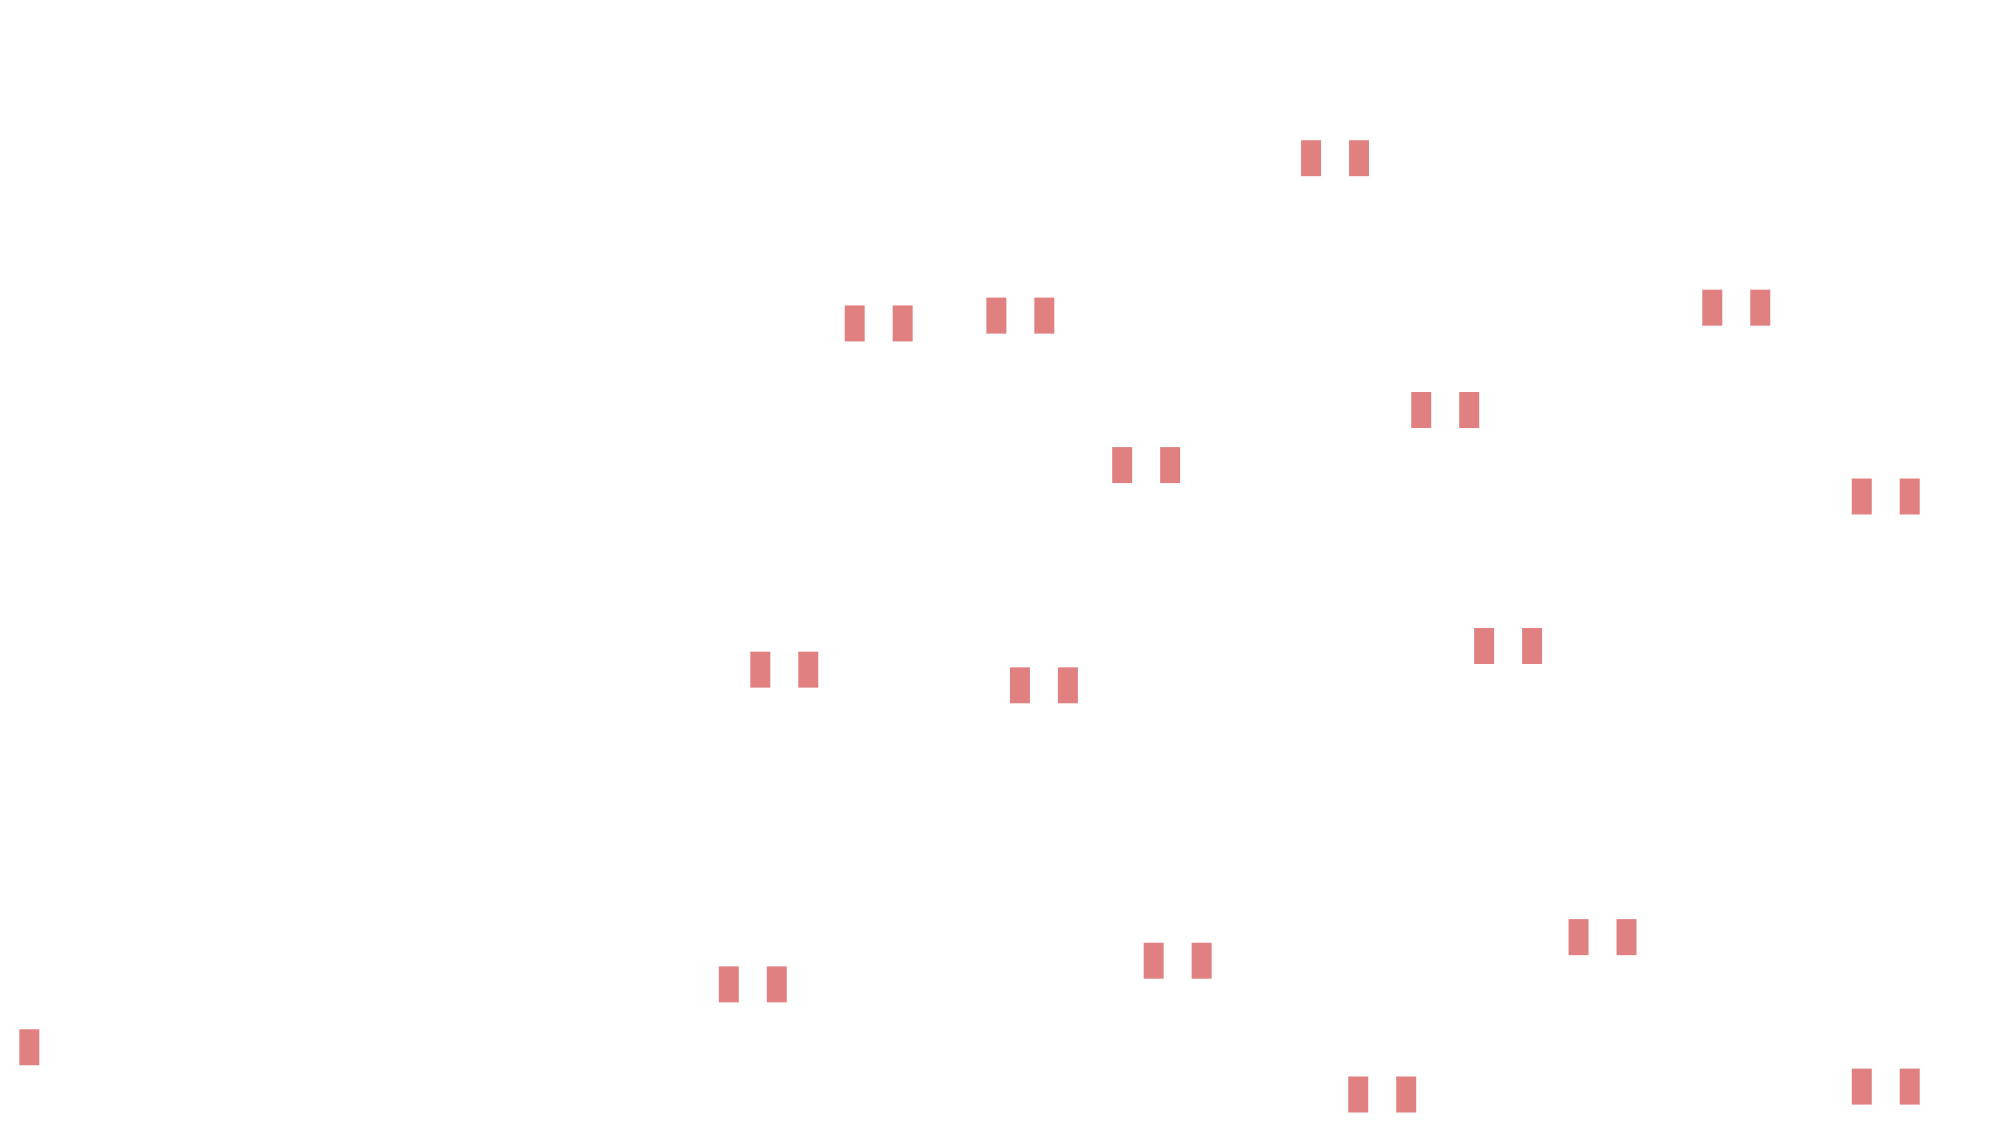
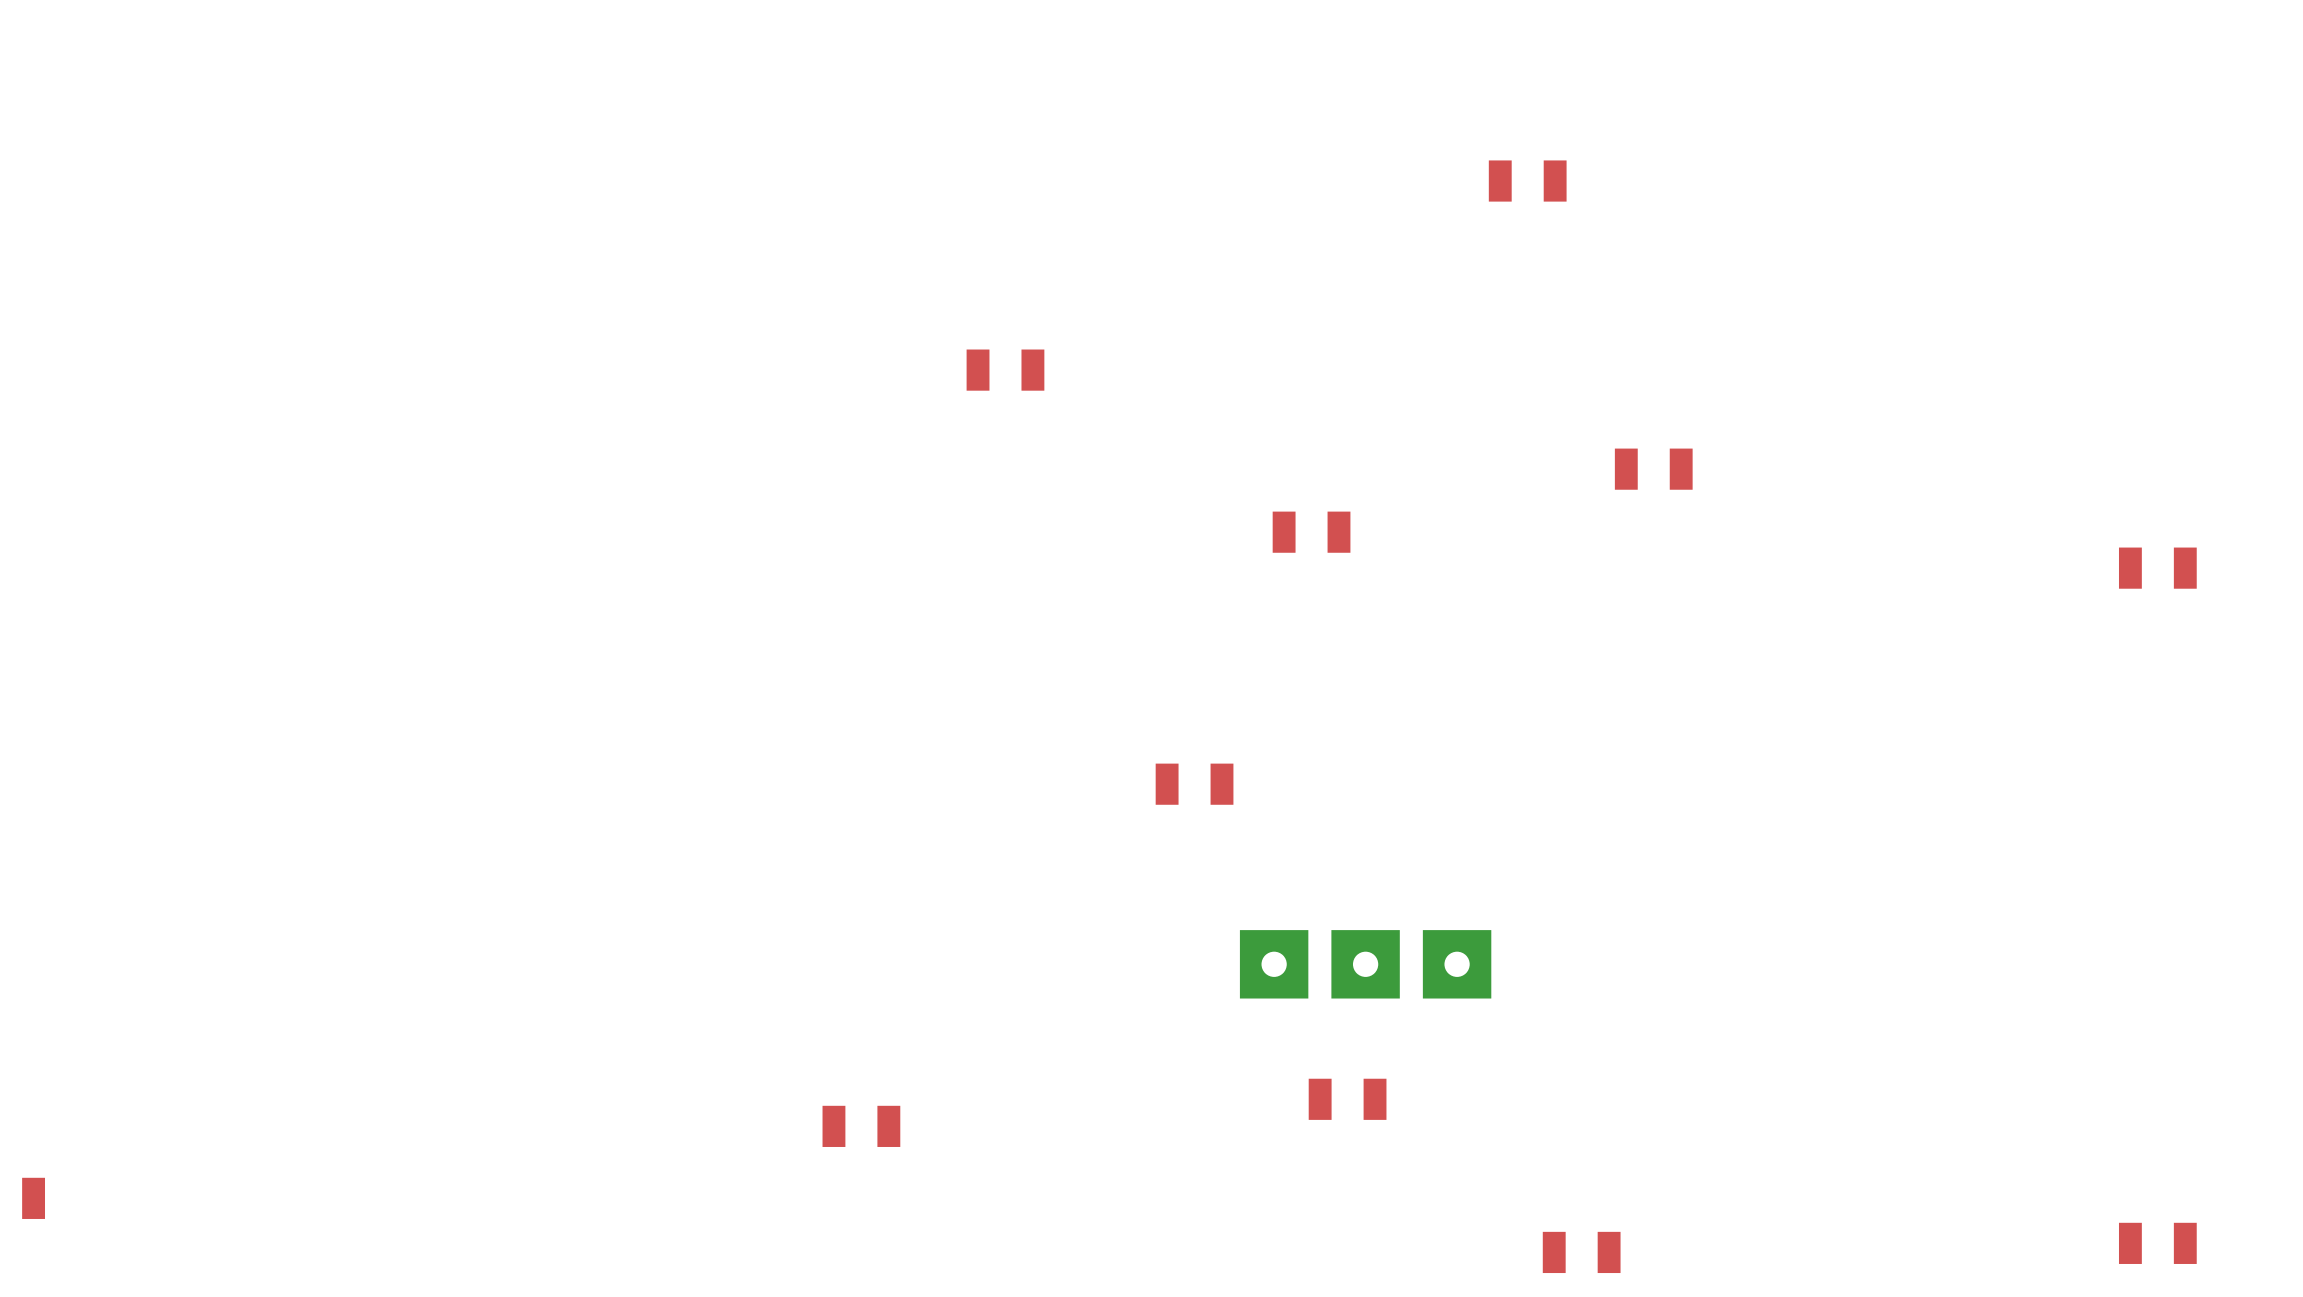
part: (1736, 307) -> none
part: (1020, 315) -> none
part: (1508, 645) -> none
part: (784, 669) -> none
part: none -> (1365, 964)
part: (1602, 937) -> none

